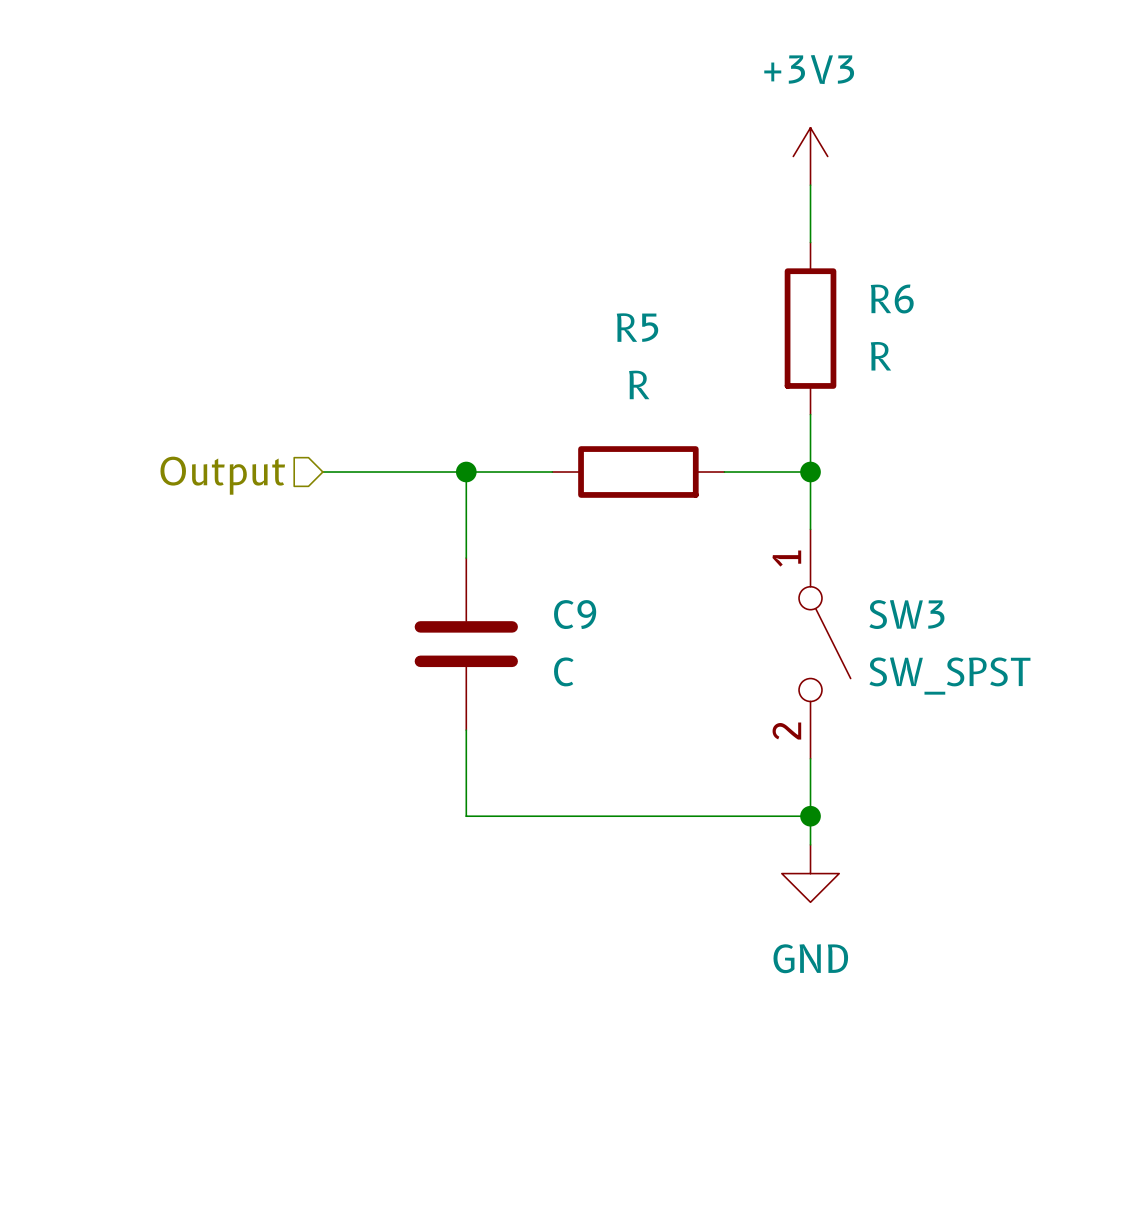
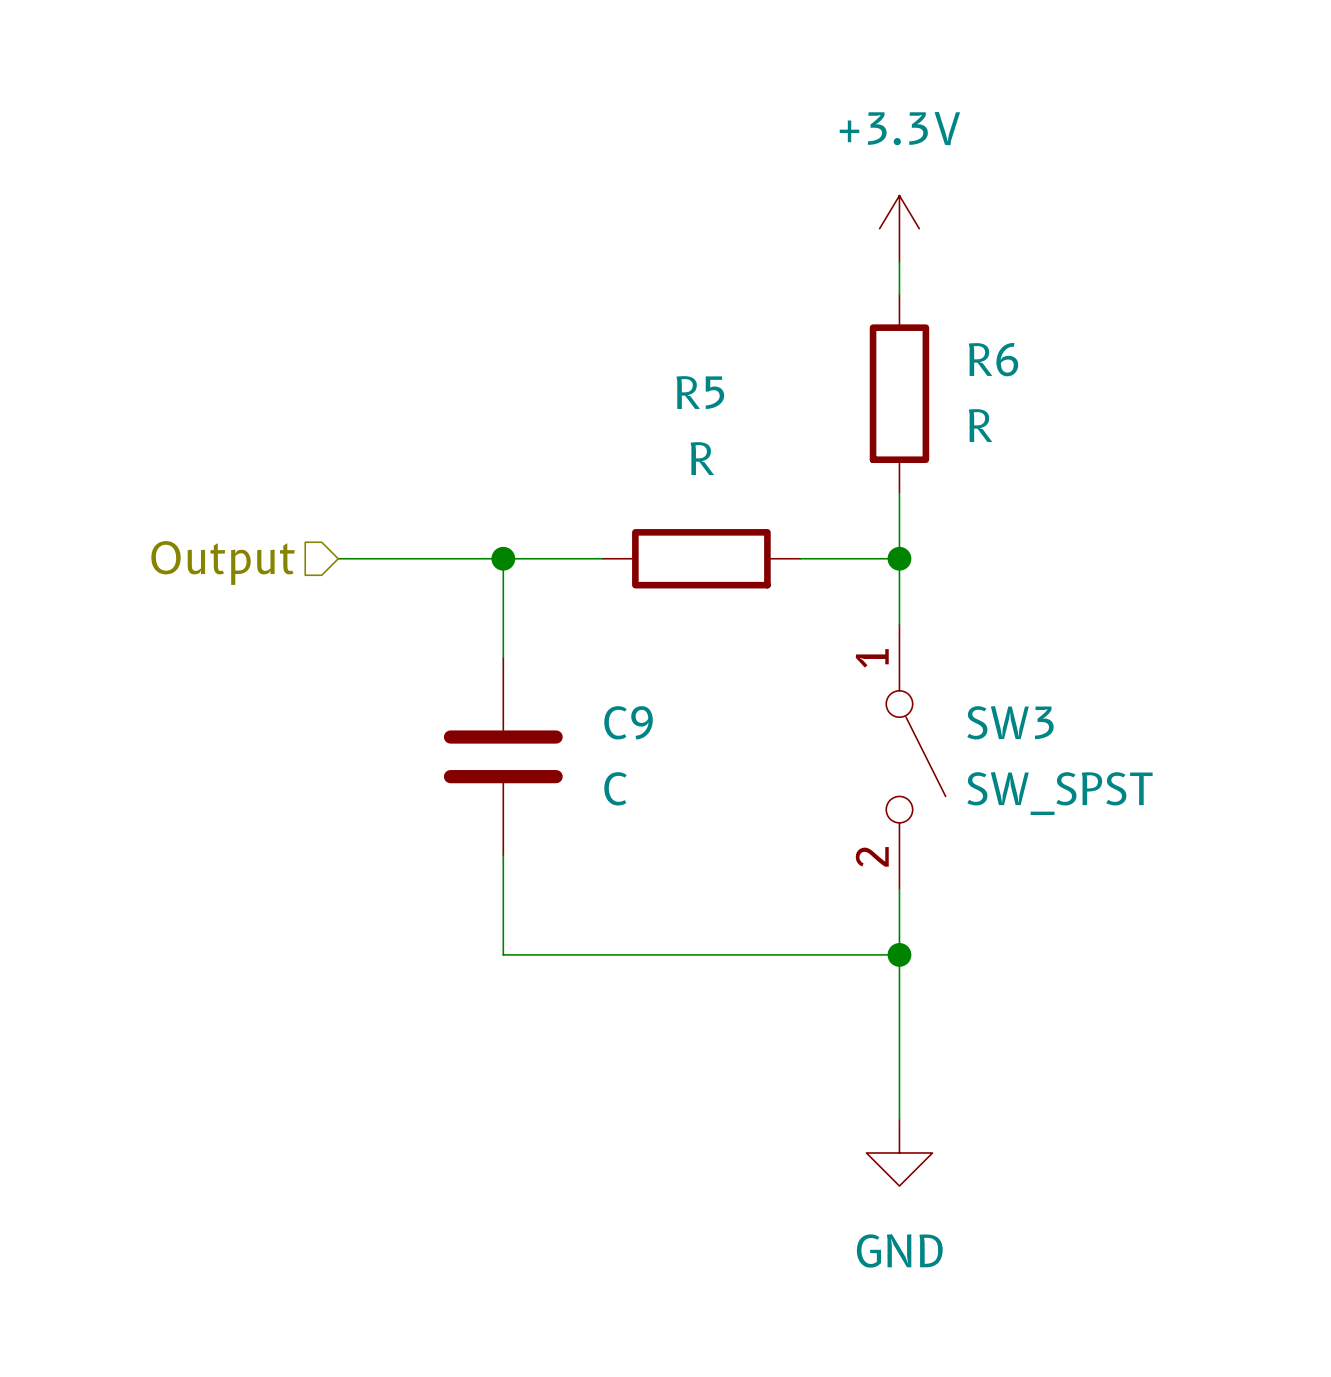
power symbol: +3V3 (810, 156) -> none
power symbol: none -> +3.3V (899, 228)
wire: none -> (899, 987) (899, 1119)
power symbol position: GND (810, 873) -> GND (899, 1152)

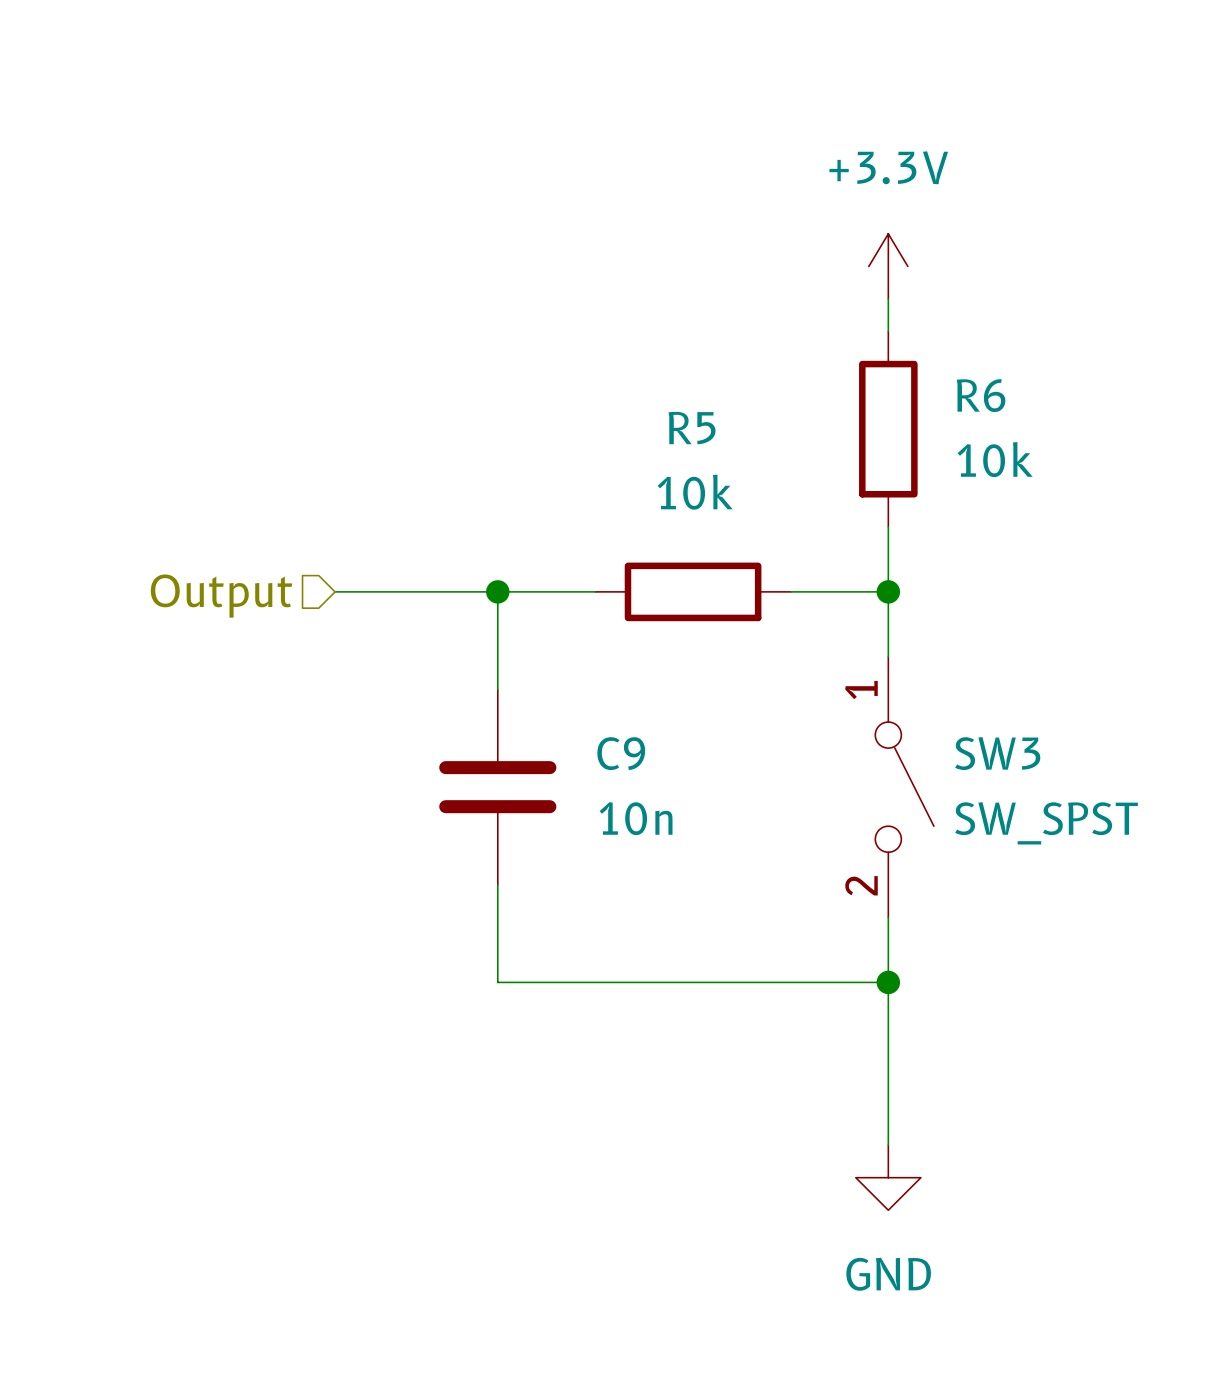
R6 value: R (980, 425) -> 10k (995, 459)
R5 value: R (702, 458) -> 10k (695, 492)
C9 value: C (615, 788) -> 10n (636, 818)

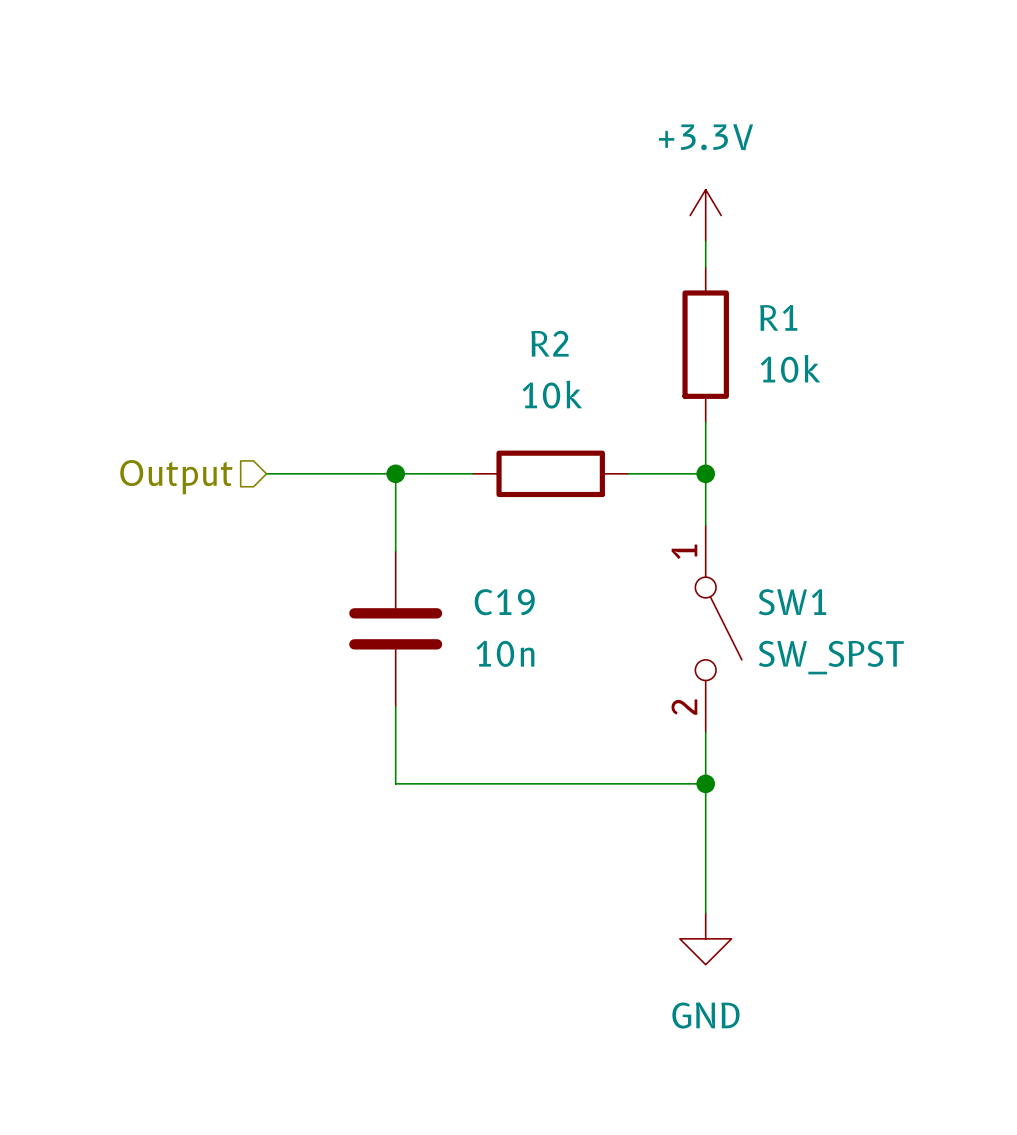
R6 name: R6 (981, 395) -> R1 (778, 317)
R5 name: R5 (692, 428) -> R2 (549, 343)
C9 name: C9 (621, 753) -> C19 (504, 602)
SW3 name: SW3 (997, 753) -> SW1 (792, 602)

